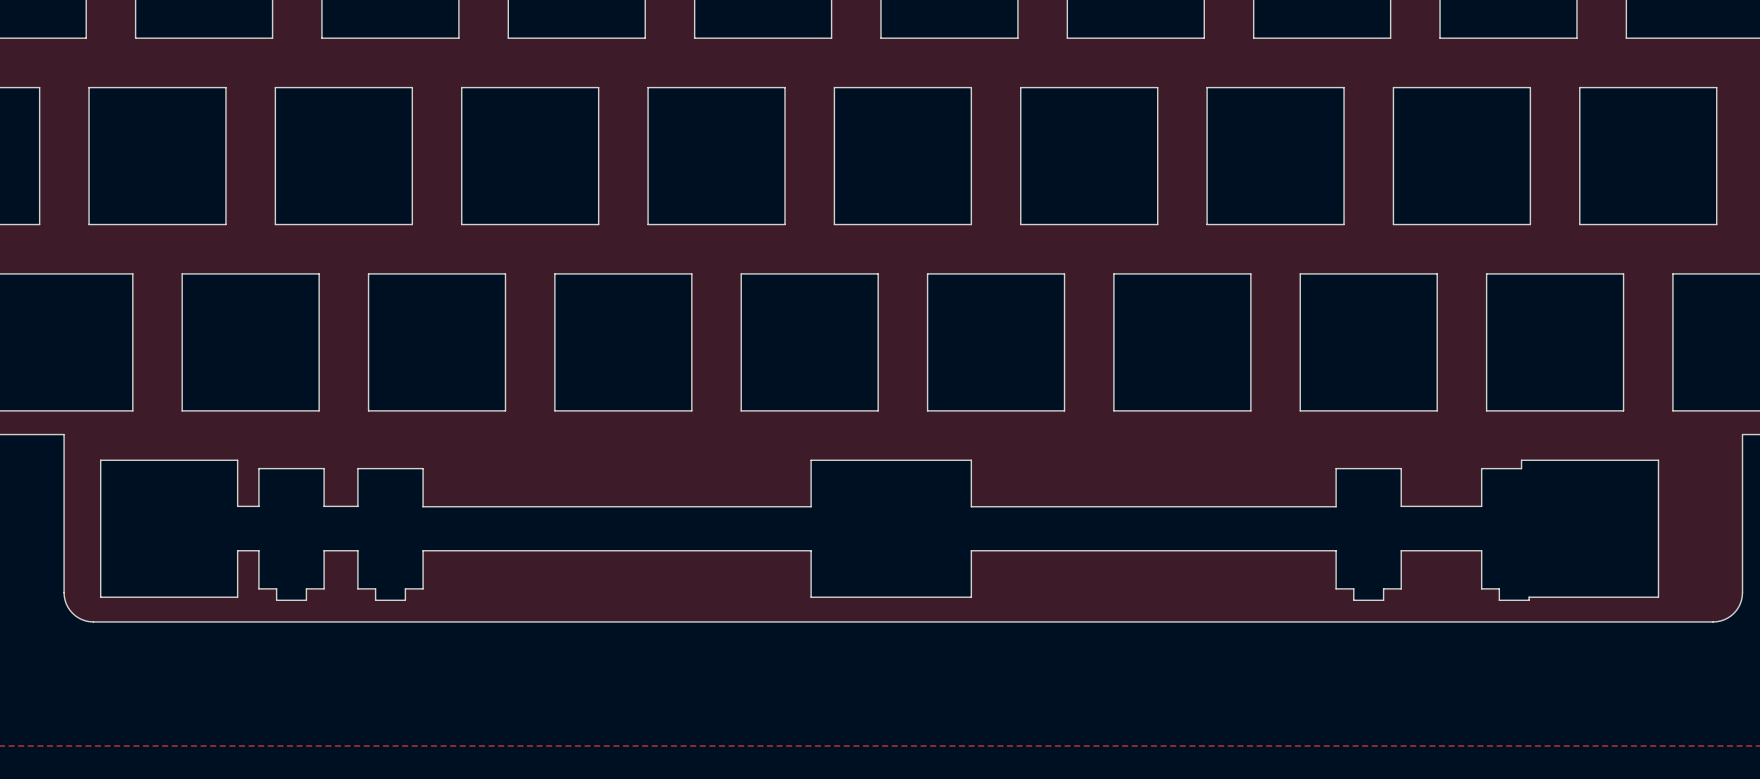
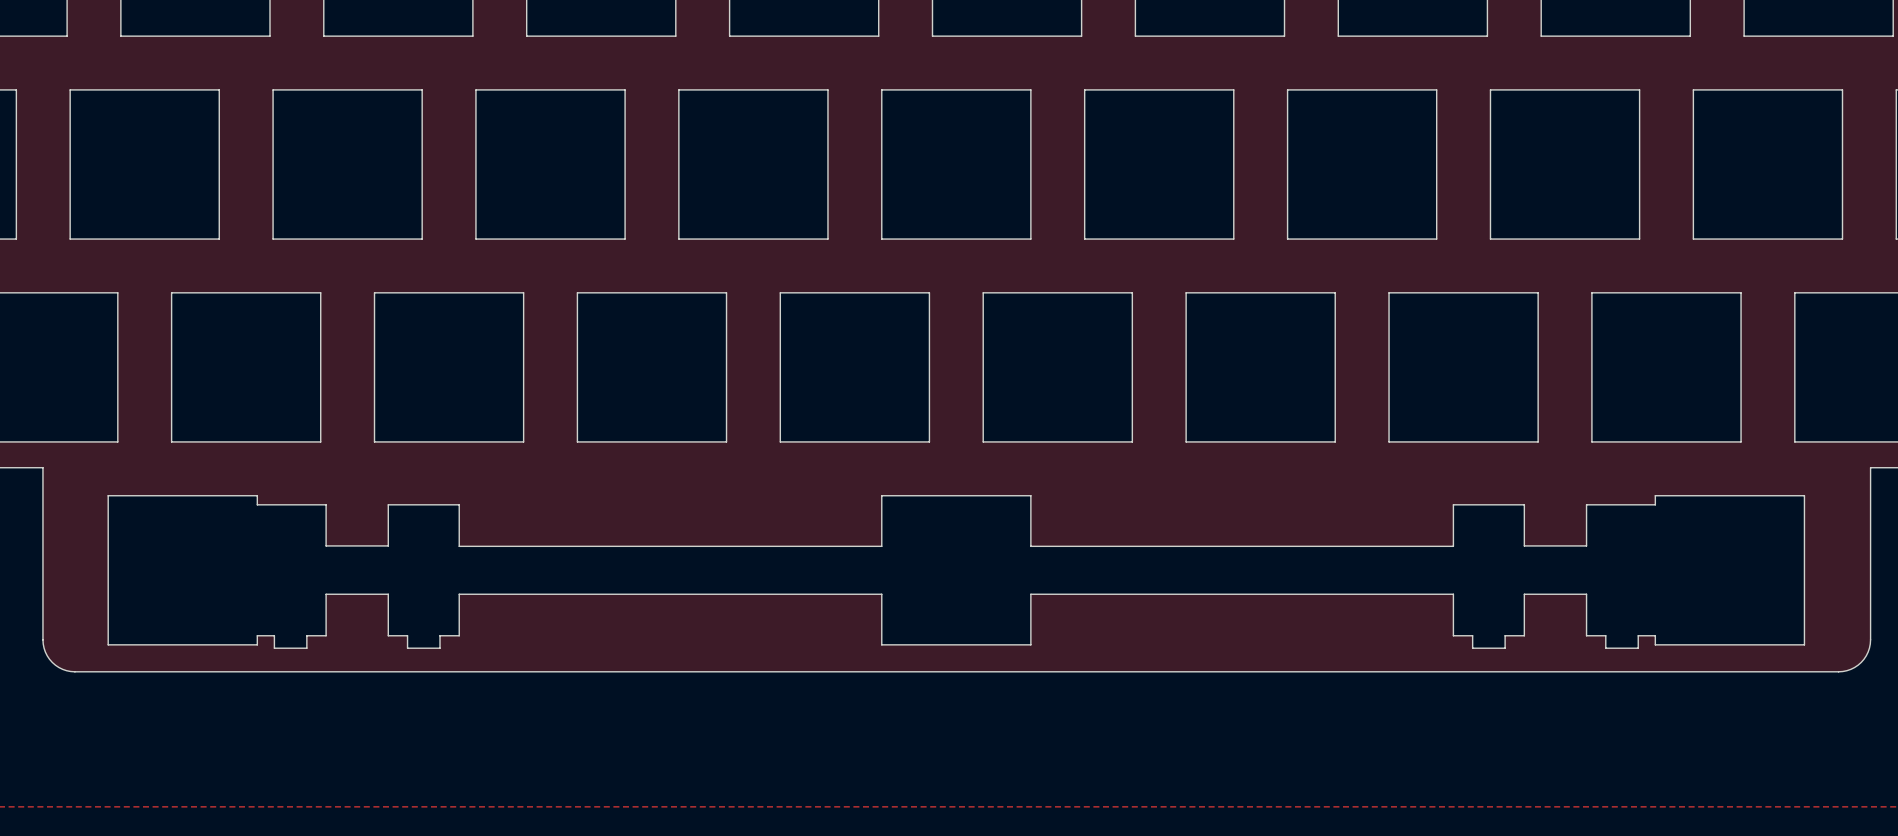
drawing: [100, 459, 1659, 601] -> none
drawing: none -> [107, 495, 1805, 649]

